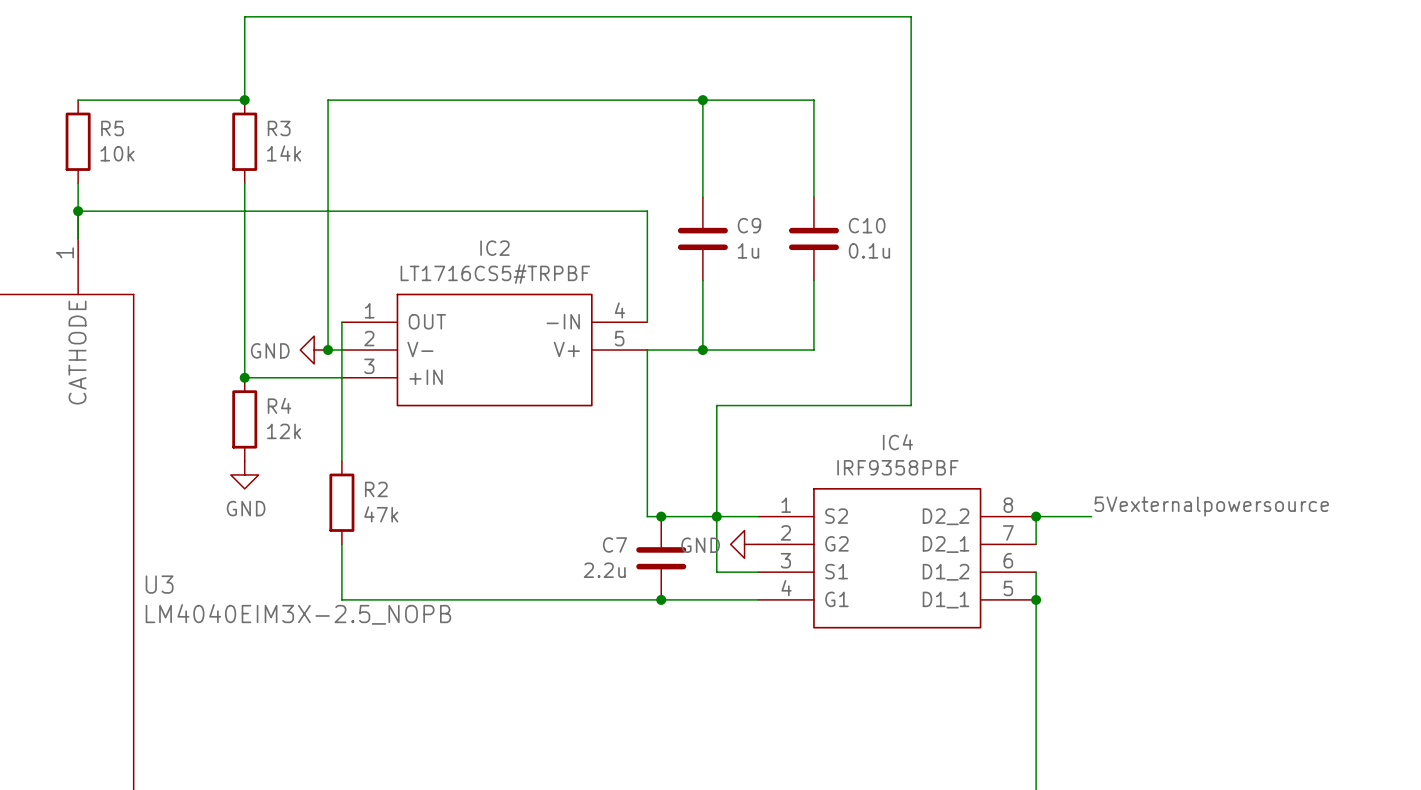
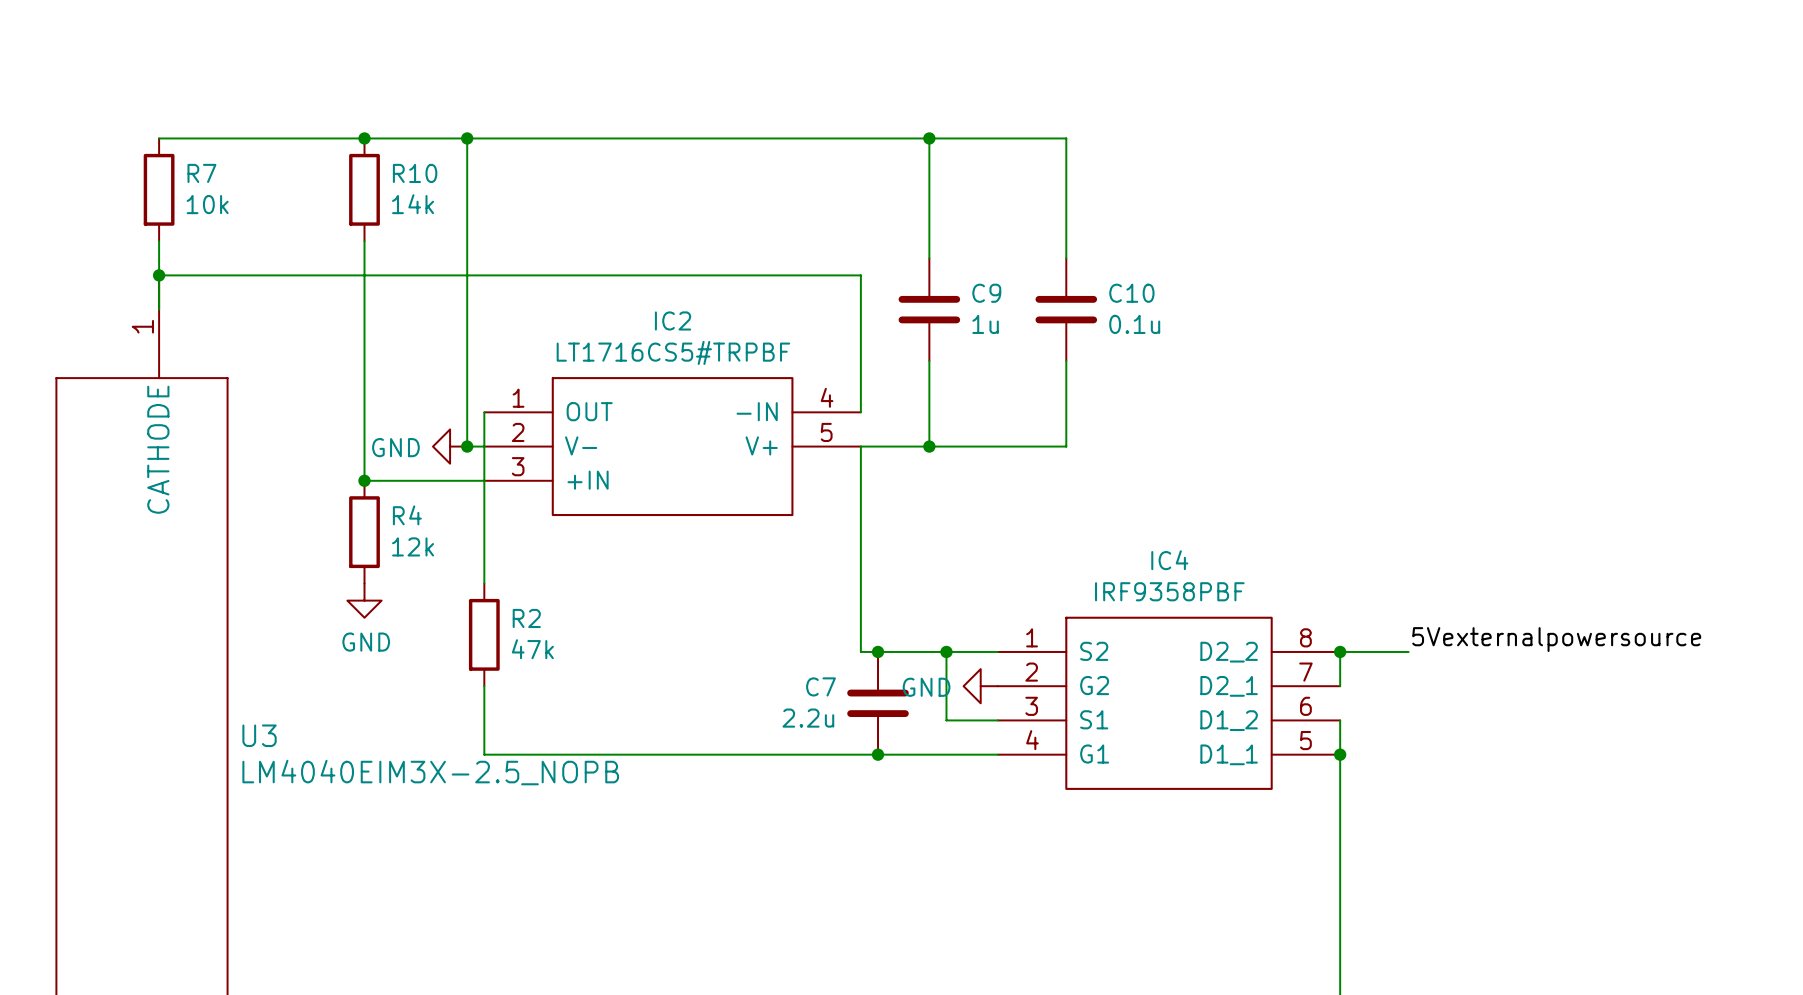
wire: (244, 100) (244, 16) (911, 16) (911, 405) (716, 405) (716, 516) -> (364, 138) (467, 138)
junction: none -> (467, 138)
R5 name: R5 (112, 128) -> R7 (201, 173)
R3 name: R3 (279, 128) -> R10 (415, 173)

